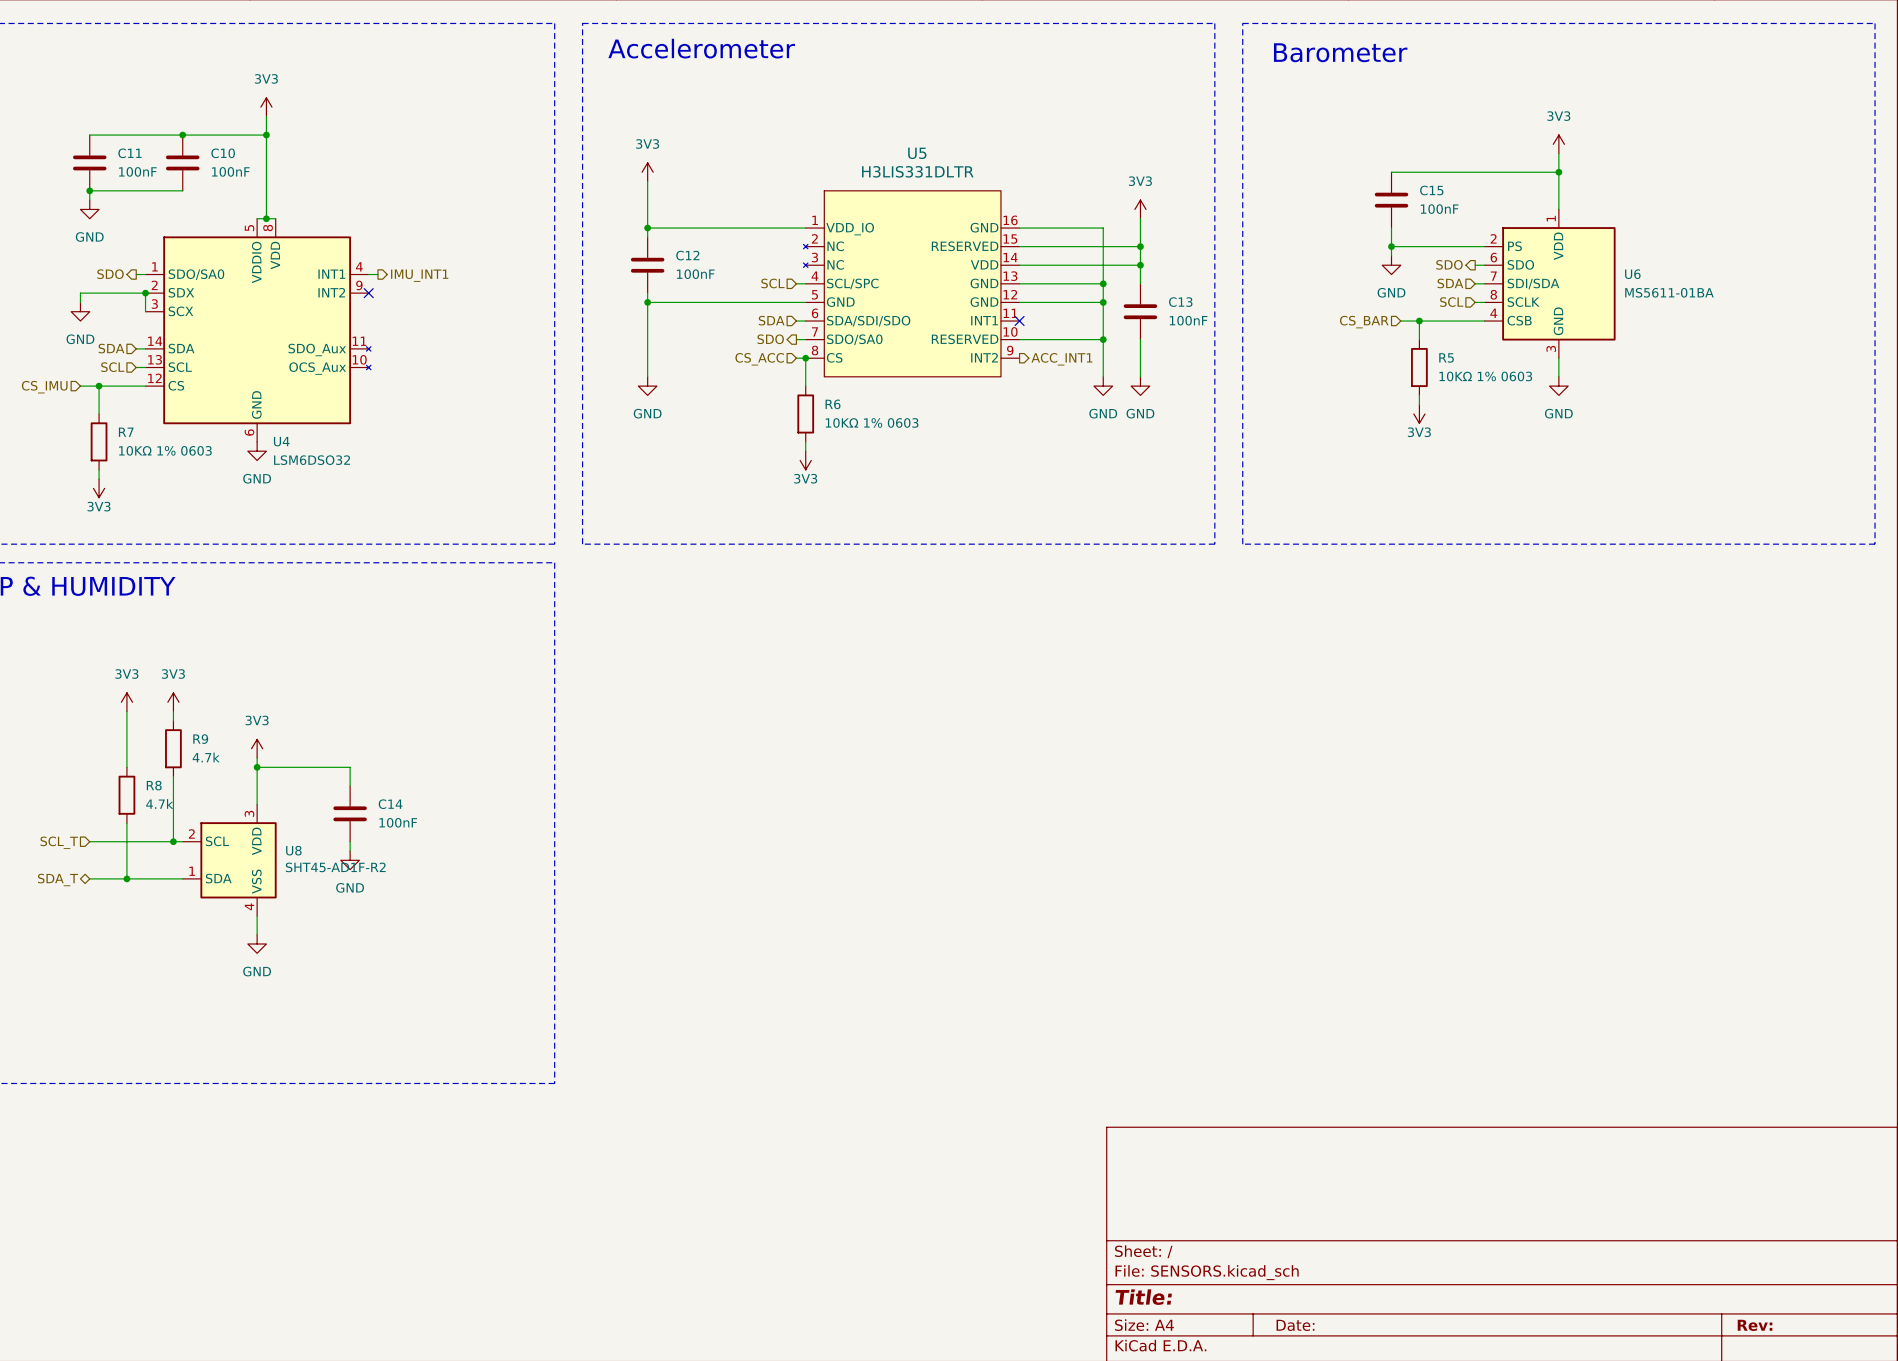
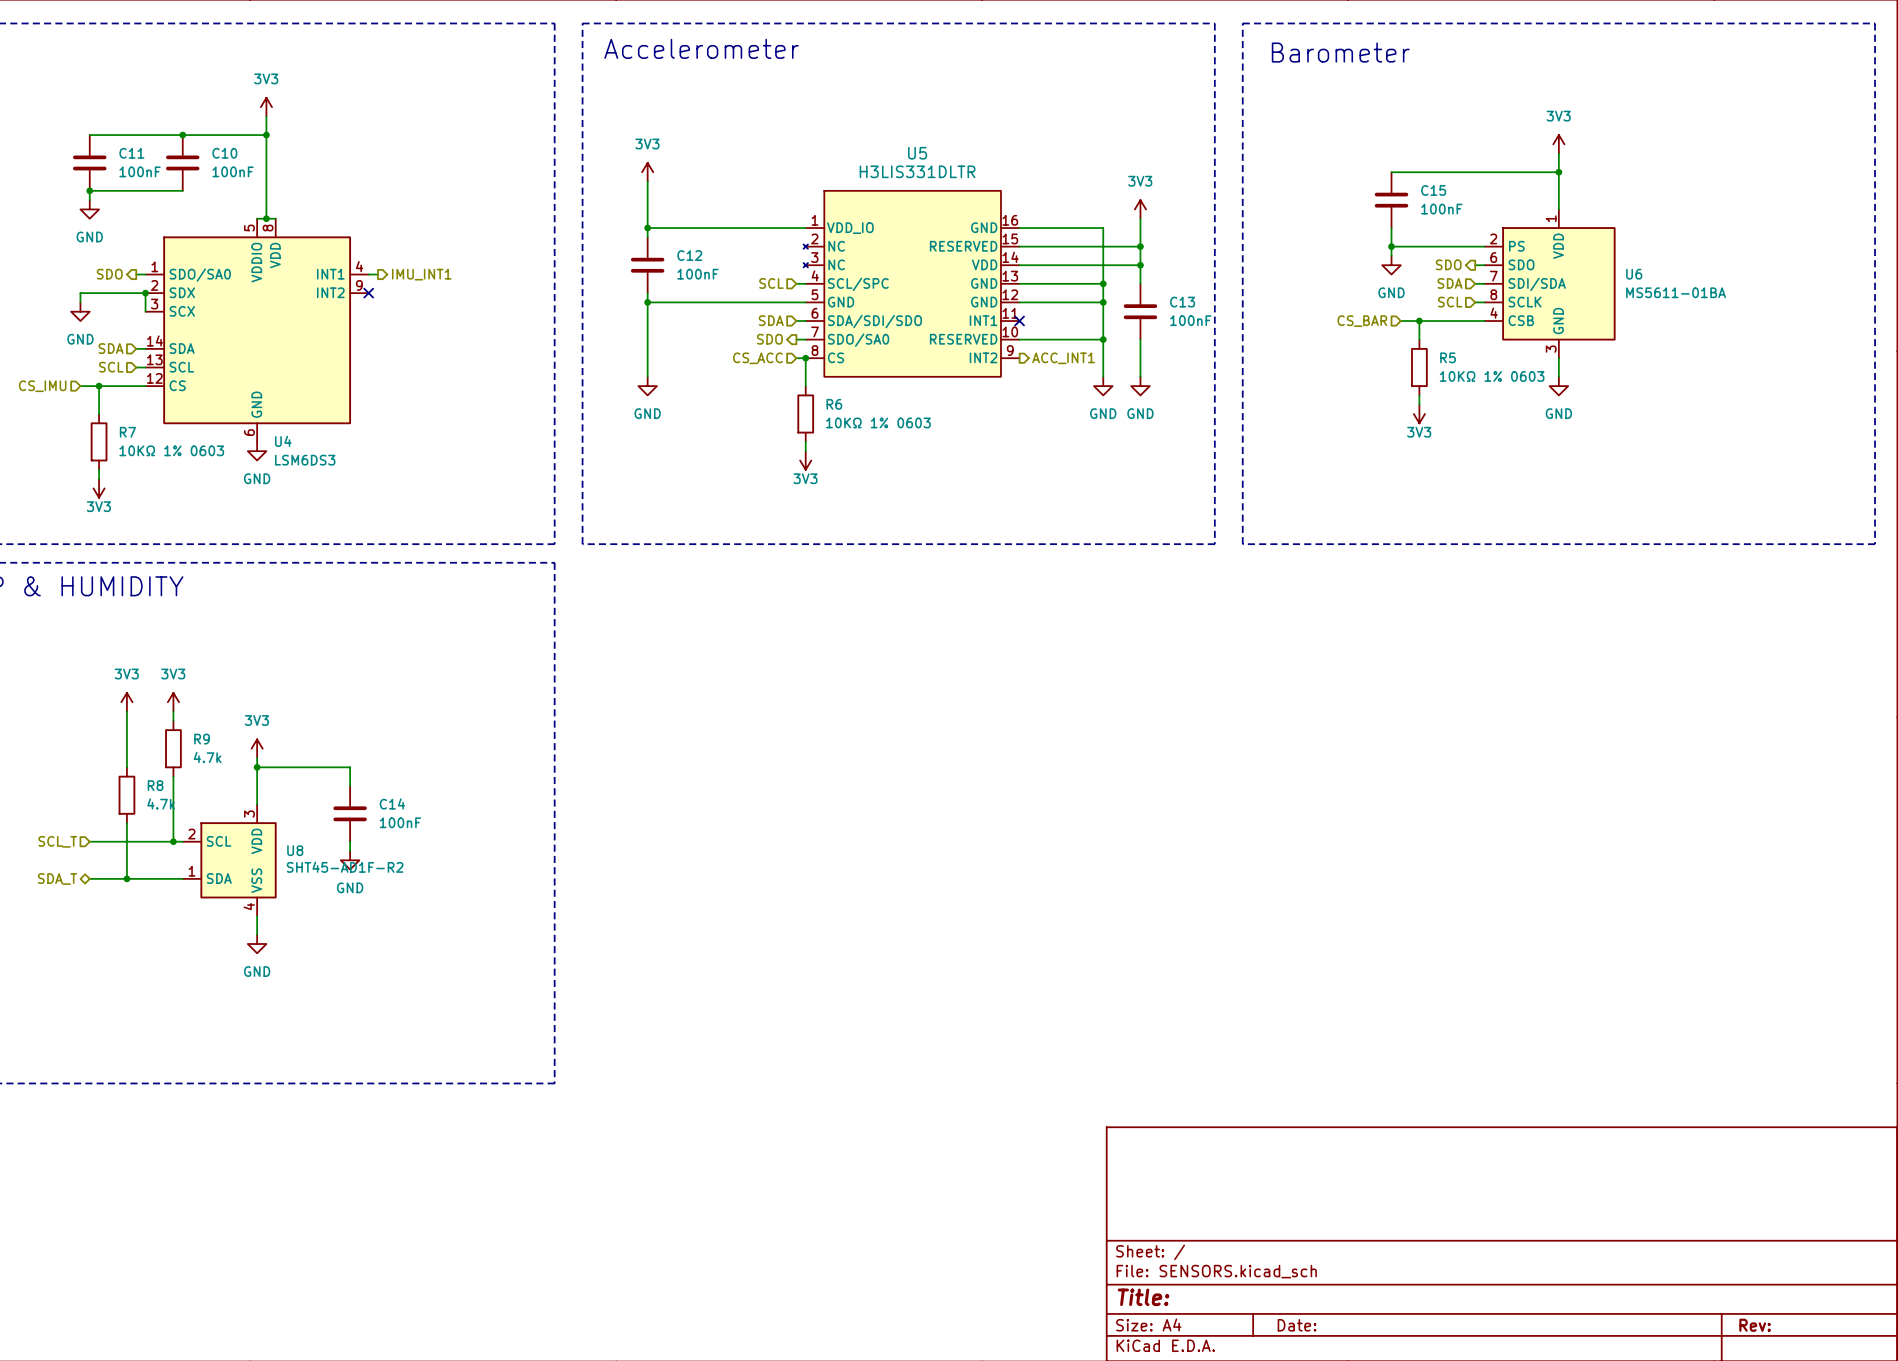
U4 symbol: [145, 218, 371, 442] -> [145, 218, 369, 442]
U4 value: LSM6DSO32 (312, 460) -> LSM6DS3 (305, 460)

